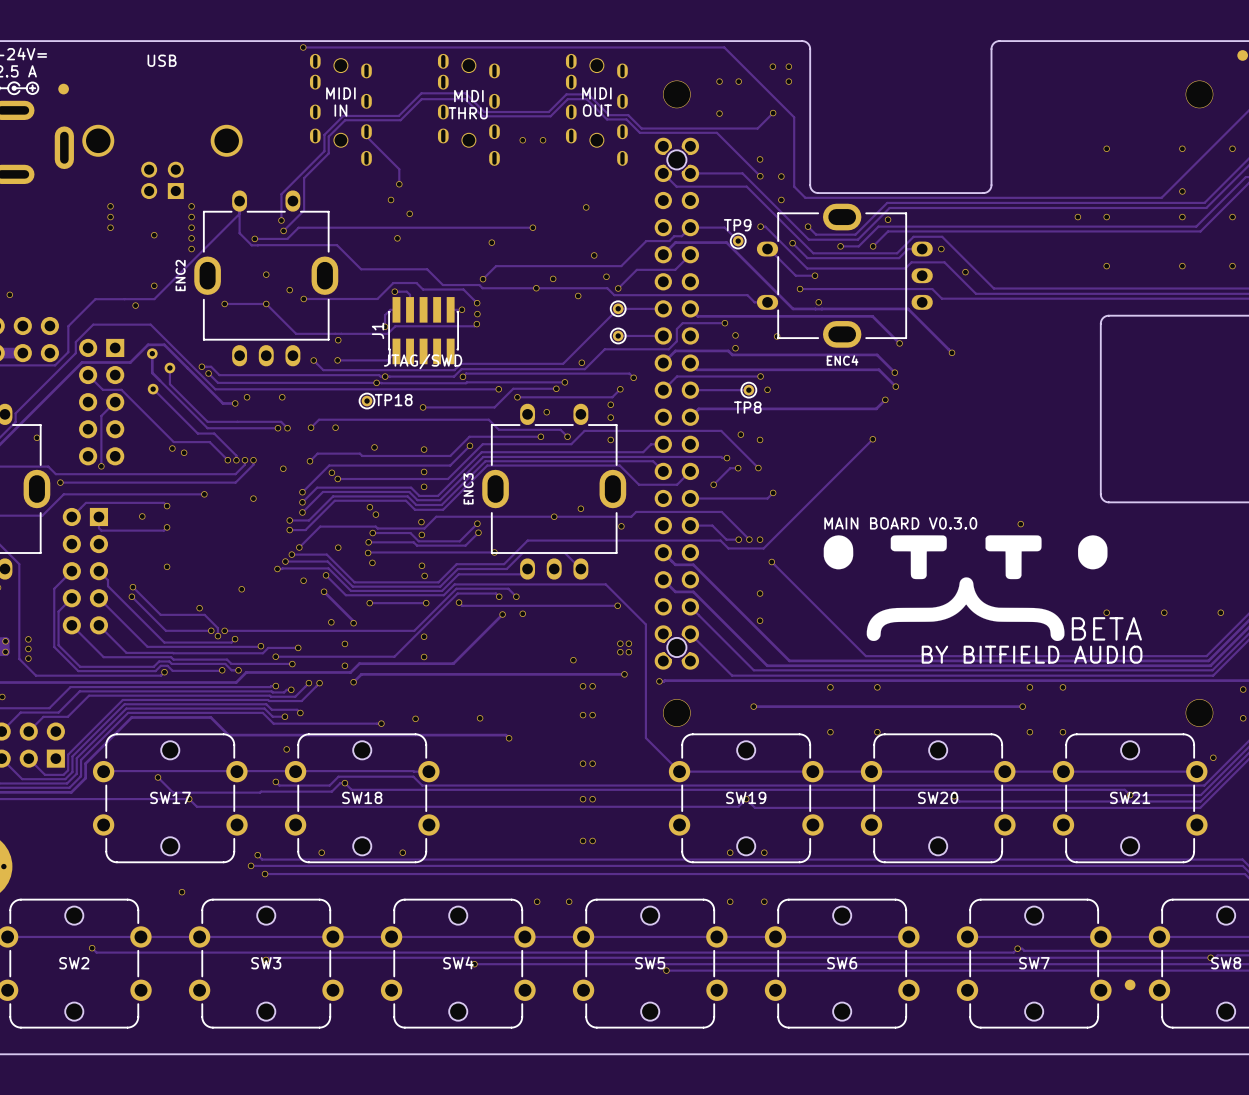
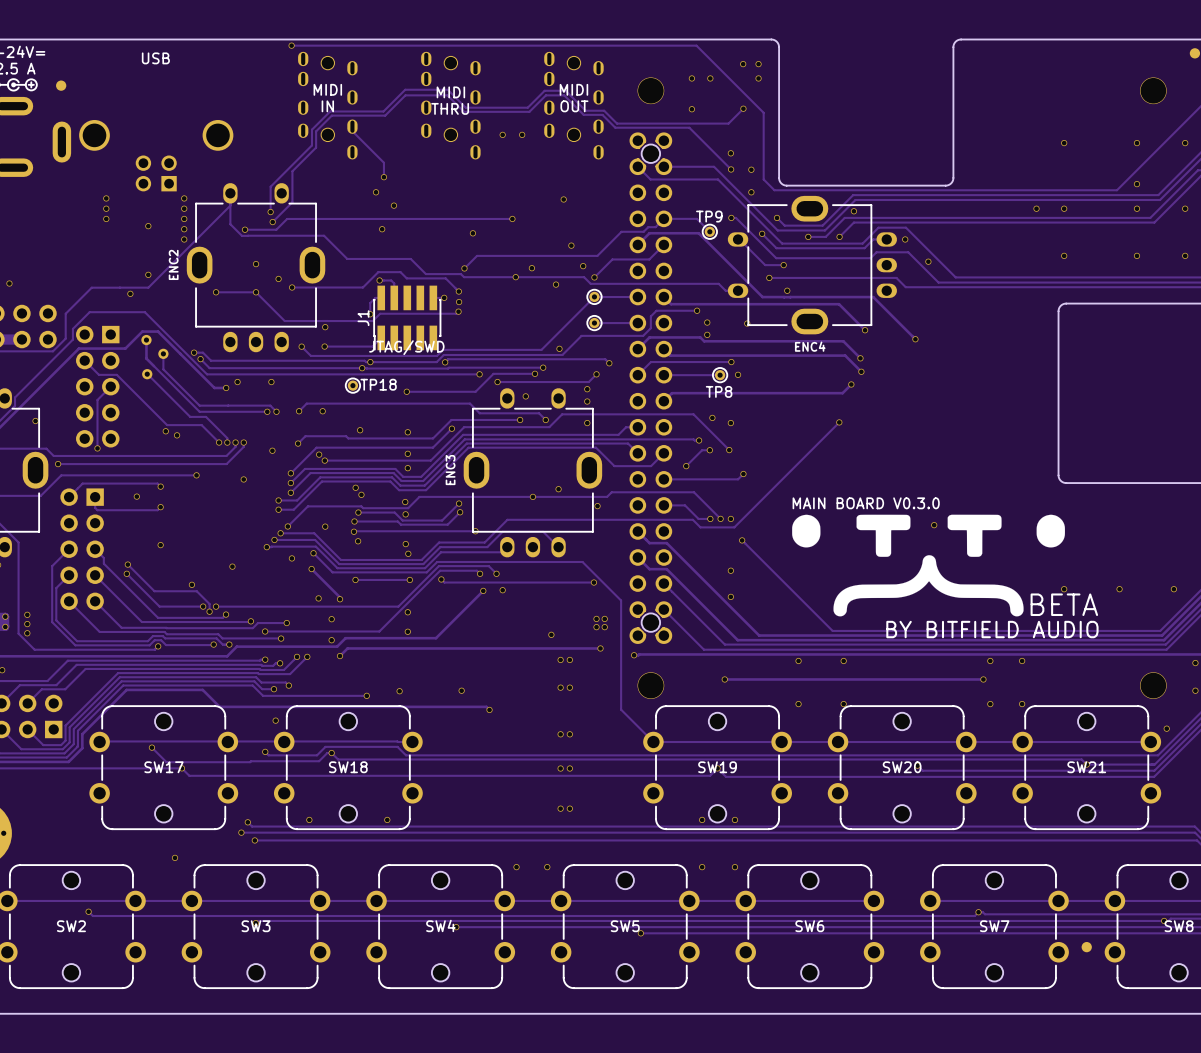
via position: (1020, 524) -> (934, 525)

